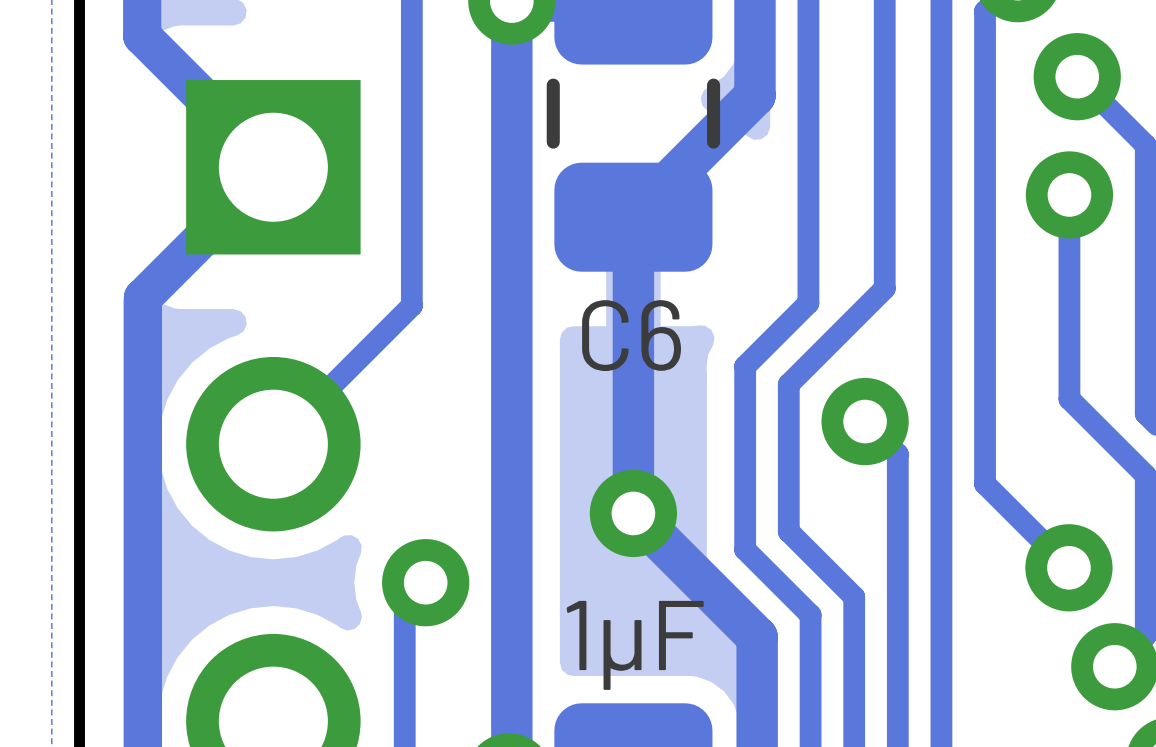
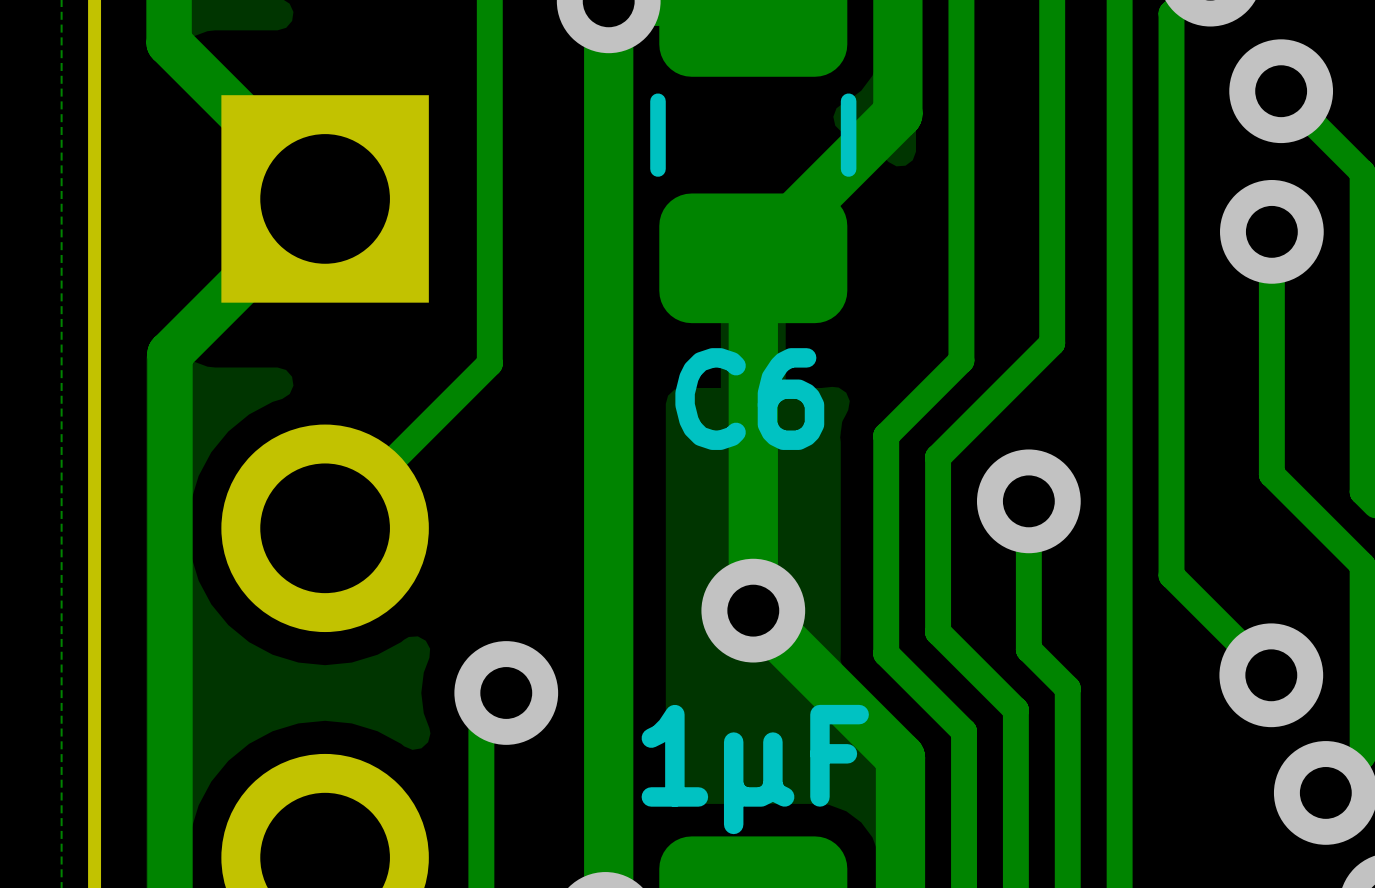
track: (865, 421) (897, 454) (897, 578) -> (1028, 501) (1028, 649) (1067, 688)

